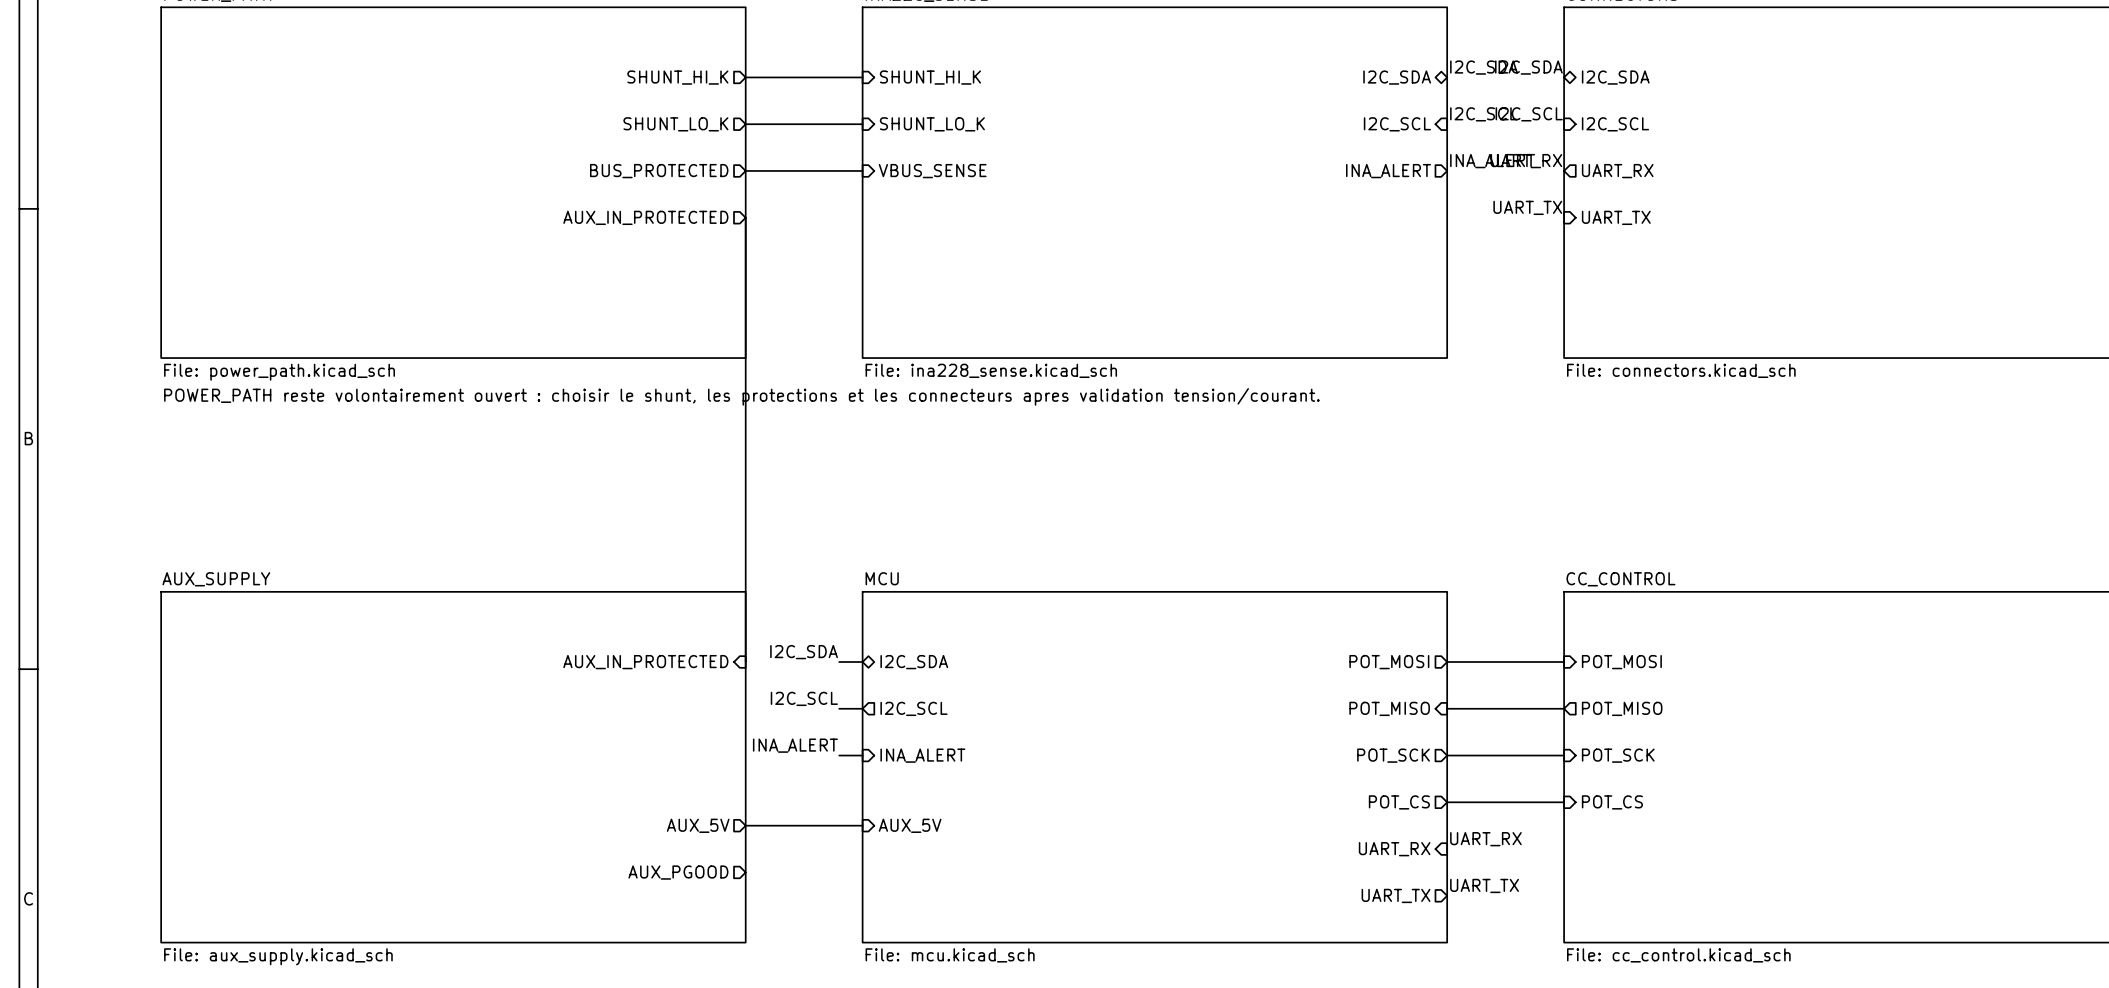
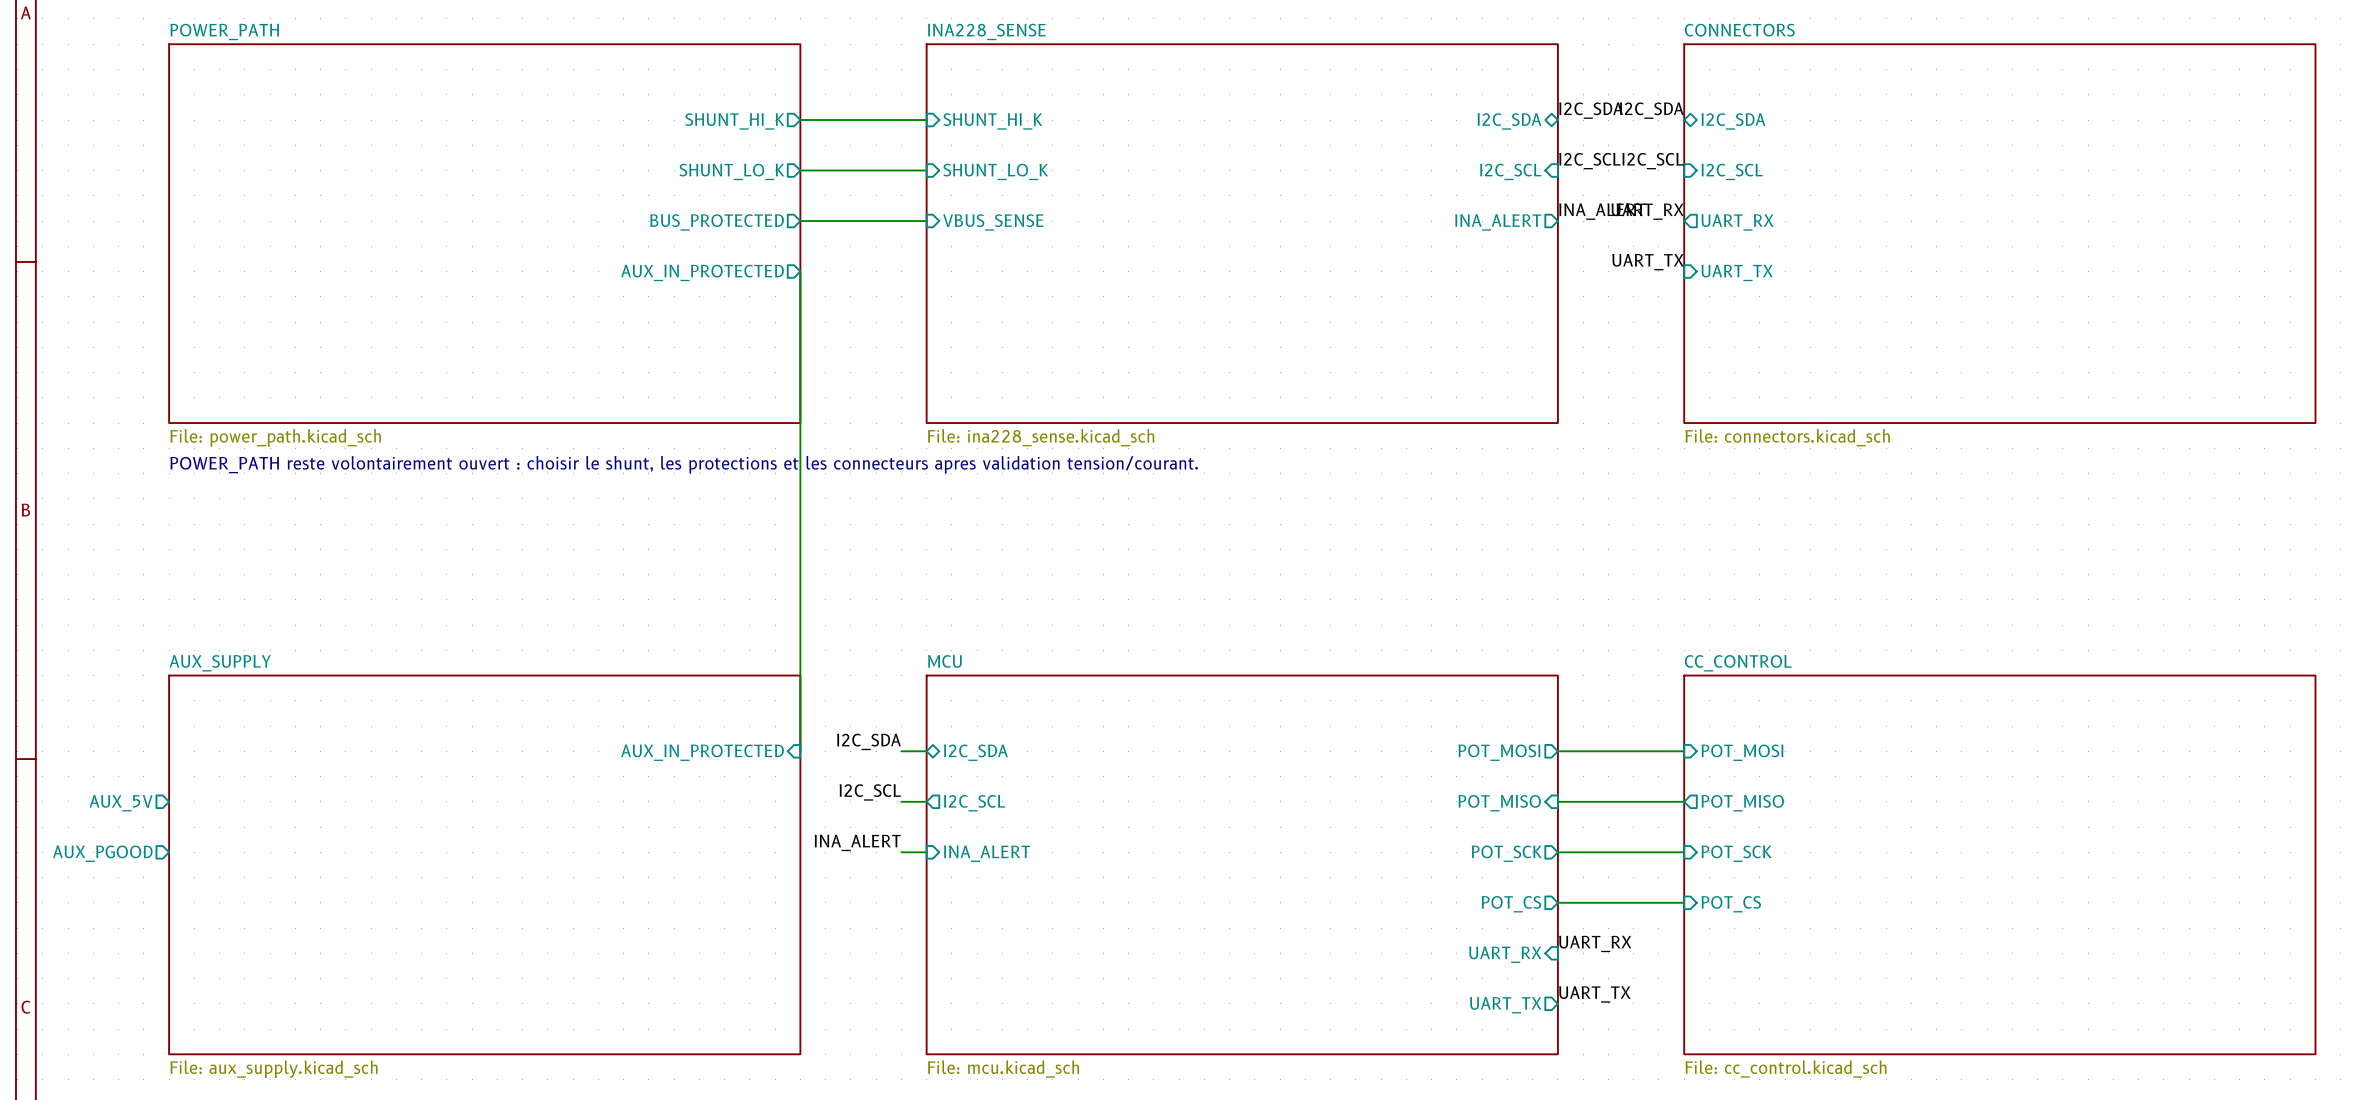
sheet pin: none -> AUX_5V (121, 803)
sheet pin: none -> AUX_PGOOD (102, 853)
sheet pin: AUX_5V (698, 825) -> none
wire: (745, 825) (862, 825) -> none
sheet pin: AUX_5V (910, 825) -> none
sheet pin: AUX_PGOOD (678, 872) -> none

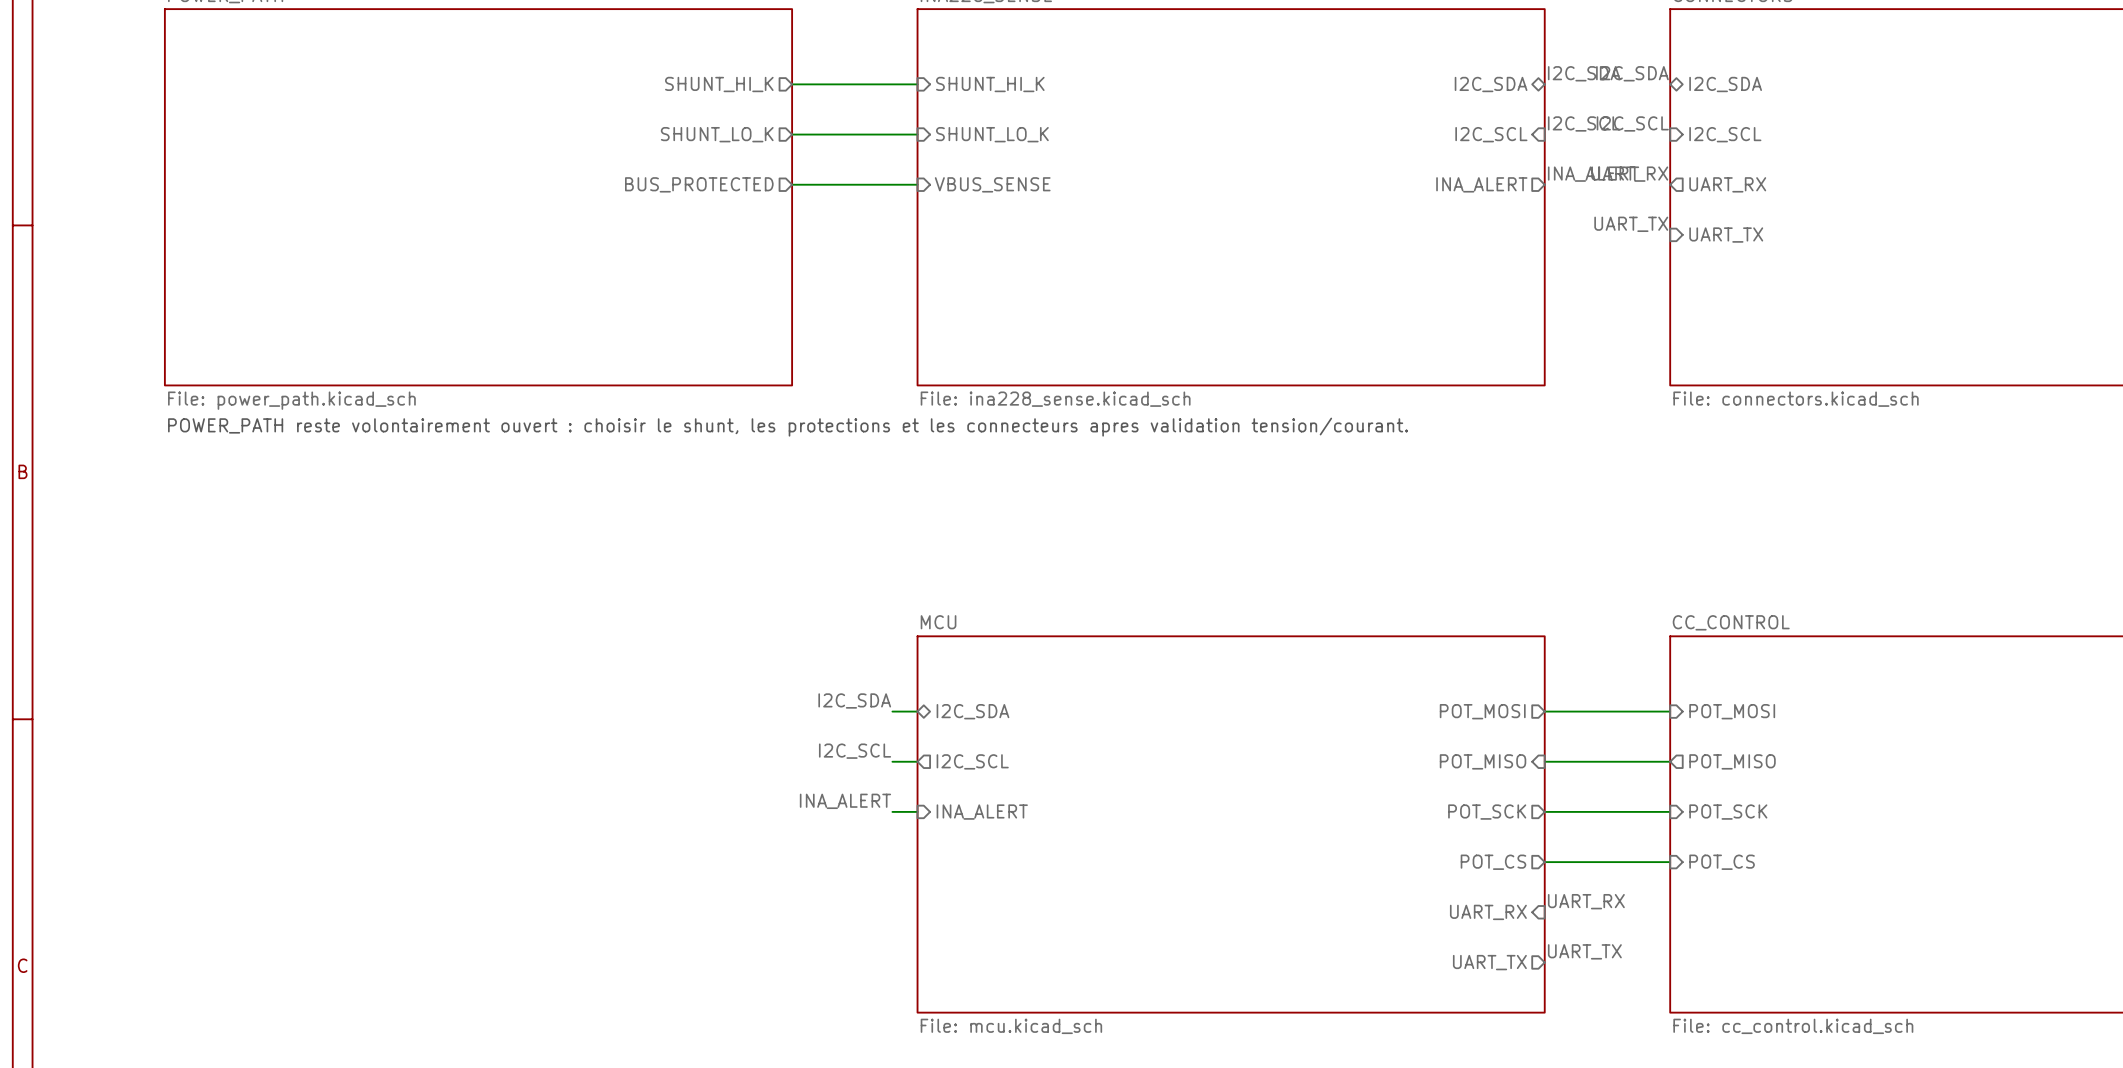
wire: (800, 271) (800, 751) -> none
sheet pin: AUX_IN_PROTECTED (702, 272) -> none
sheet pin: AUX_IN_PROTECTED (702, 752) -> none
sheet pin: AUX_5V (121, 803) -> none
sheet pin: AUX_PGOOD (102, 853) -> none
sheet AUX_SUPPLY: File: aux_supply.kicad_sch (484, 864) -> none

